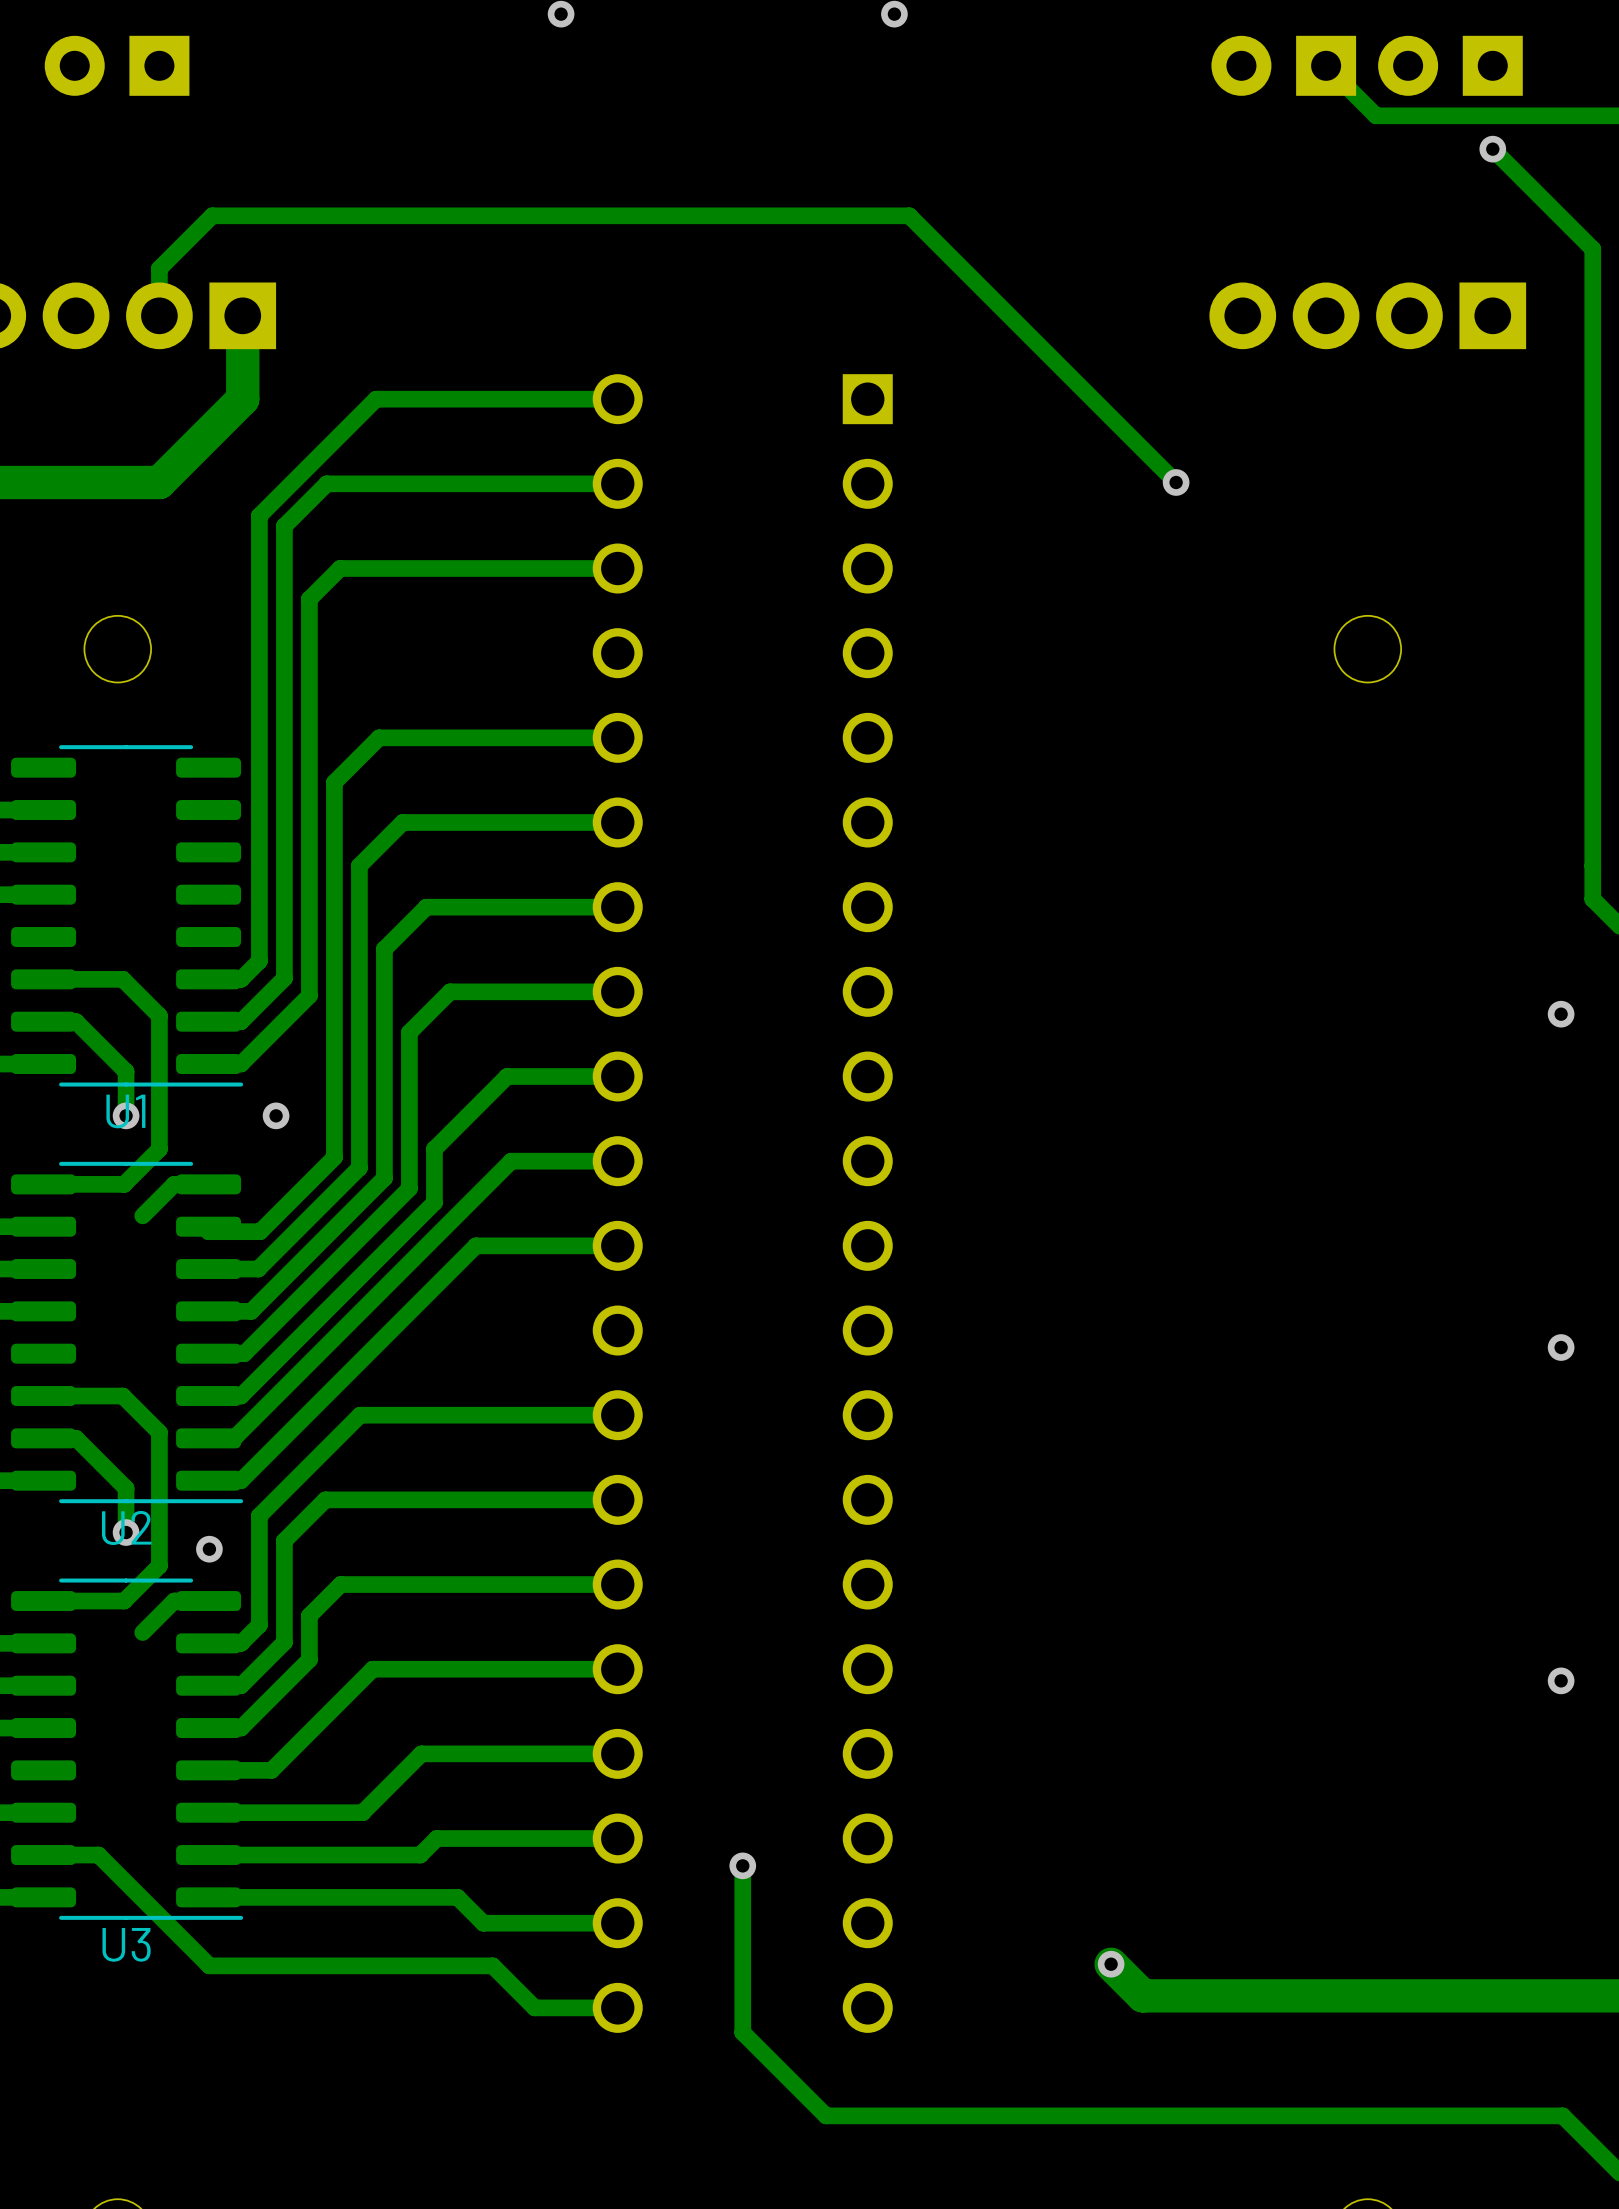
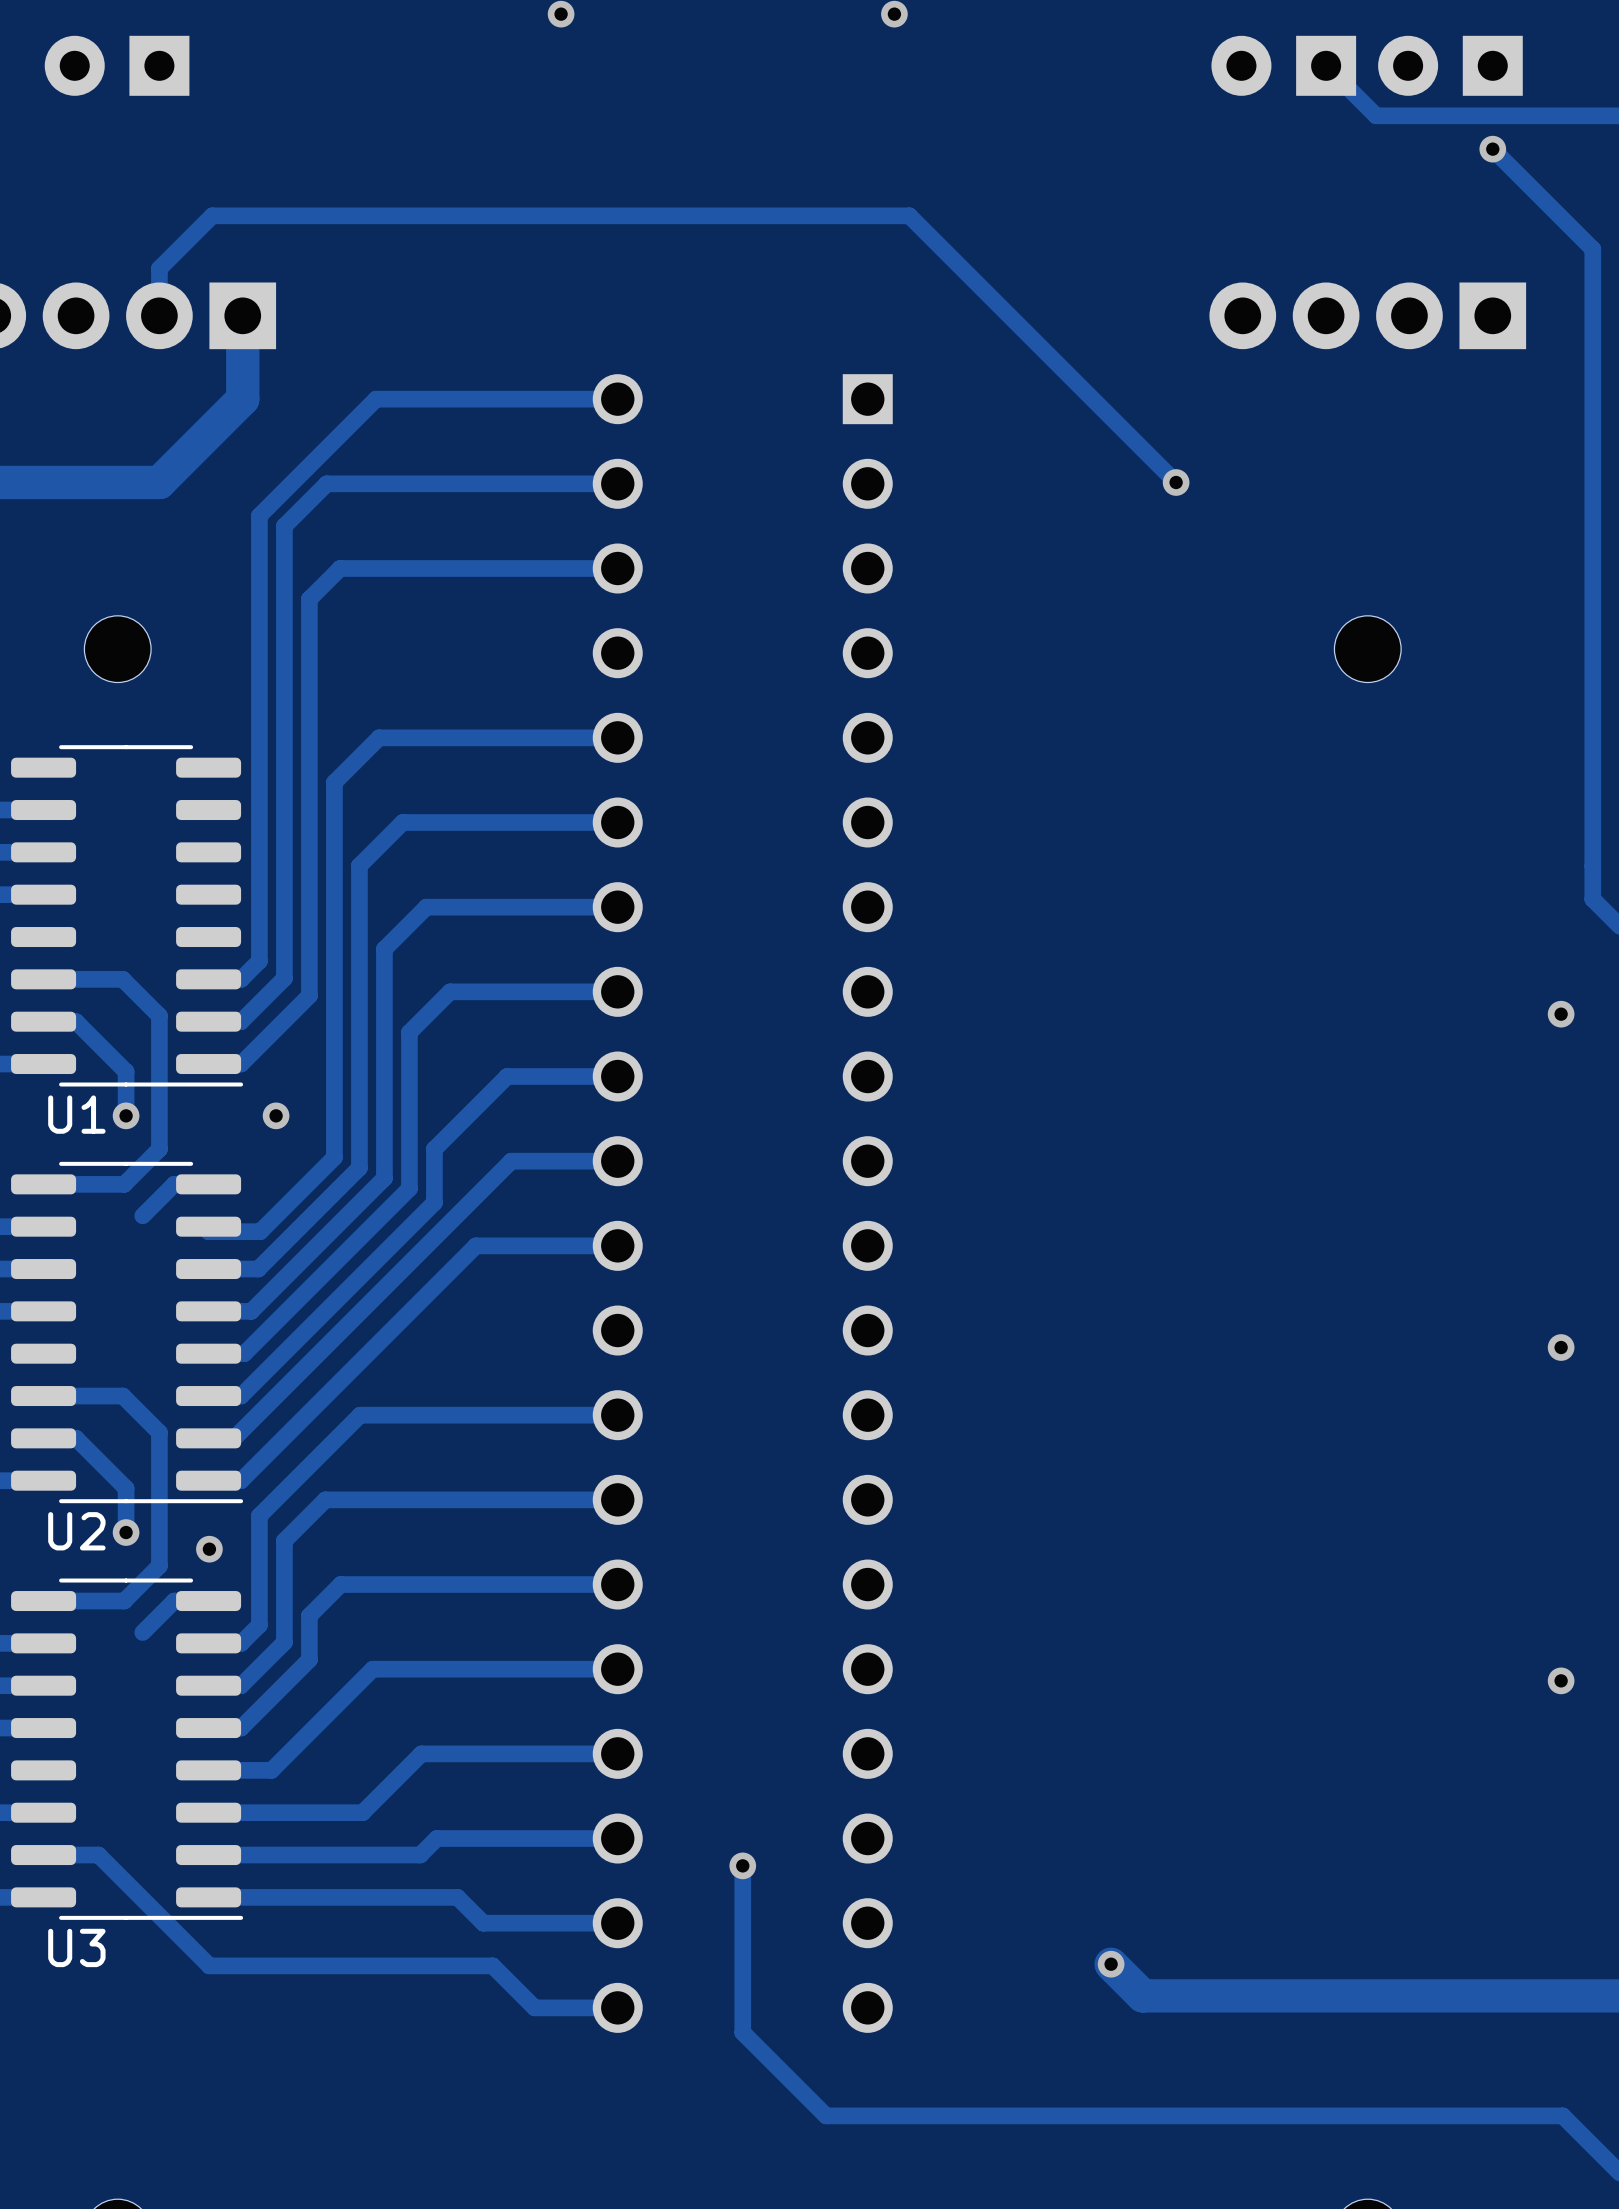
U1 name position: U1 (125, 1111) -> U1 (76, 1114)
U2 name position: U2 (126, 1527) -> U2 (76, 1531)
U3 name position: U3 (126, 1944) -> U3 (76, 1947)

